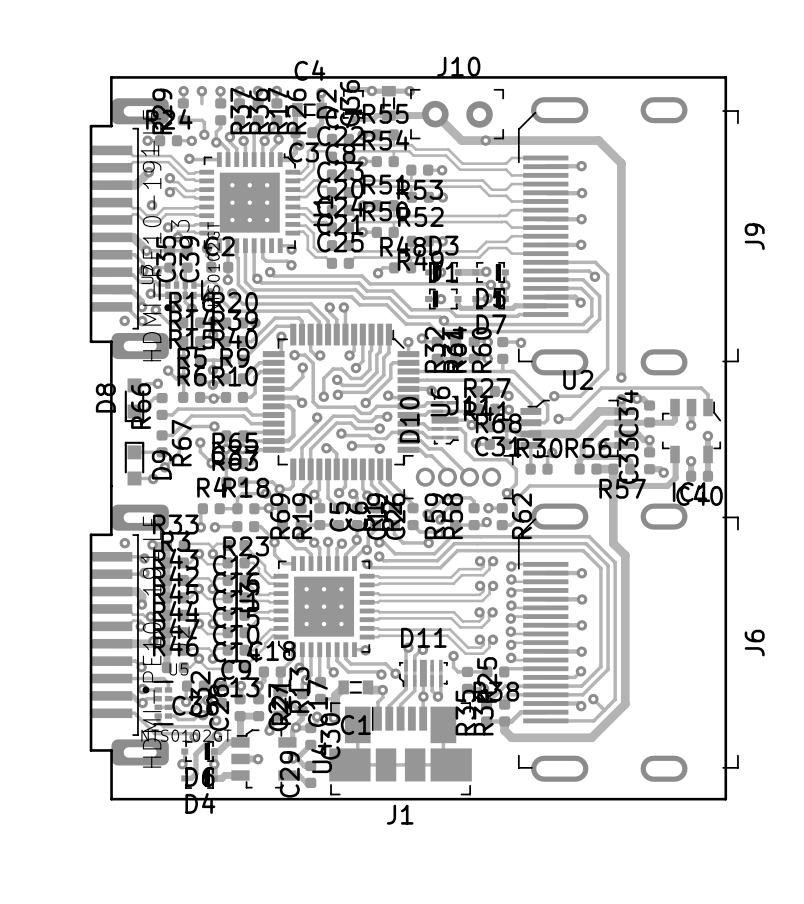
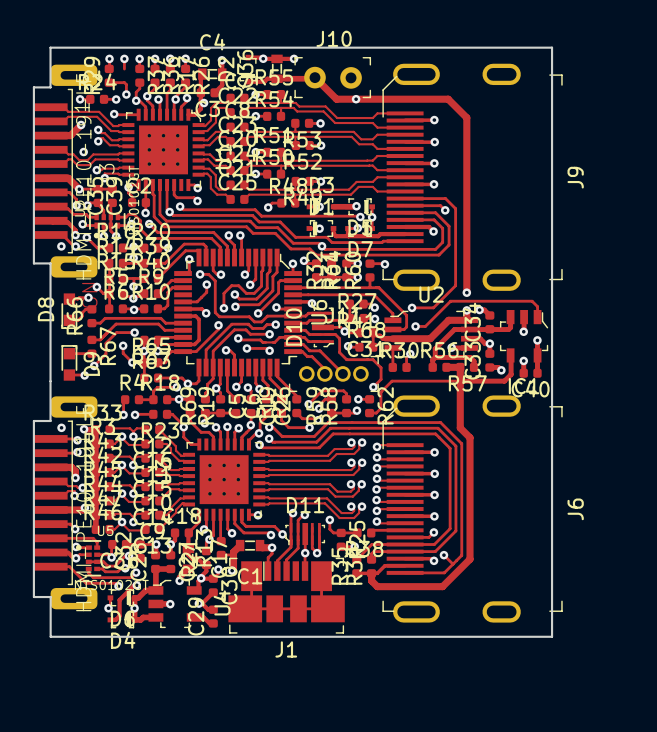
part: none -> (89, 295)

